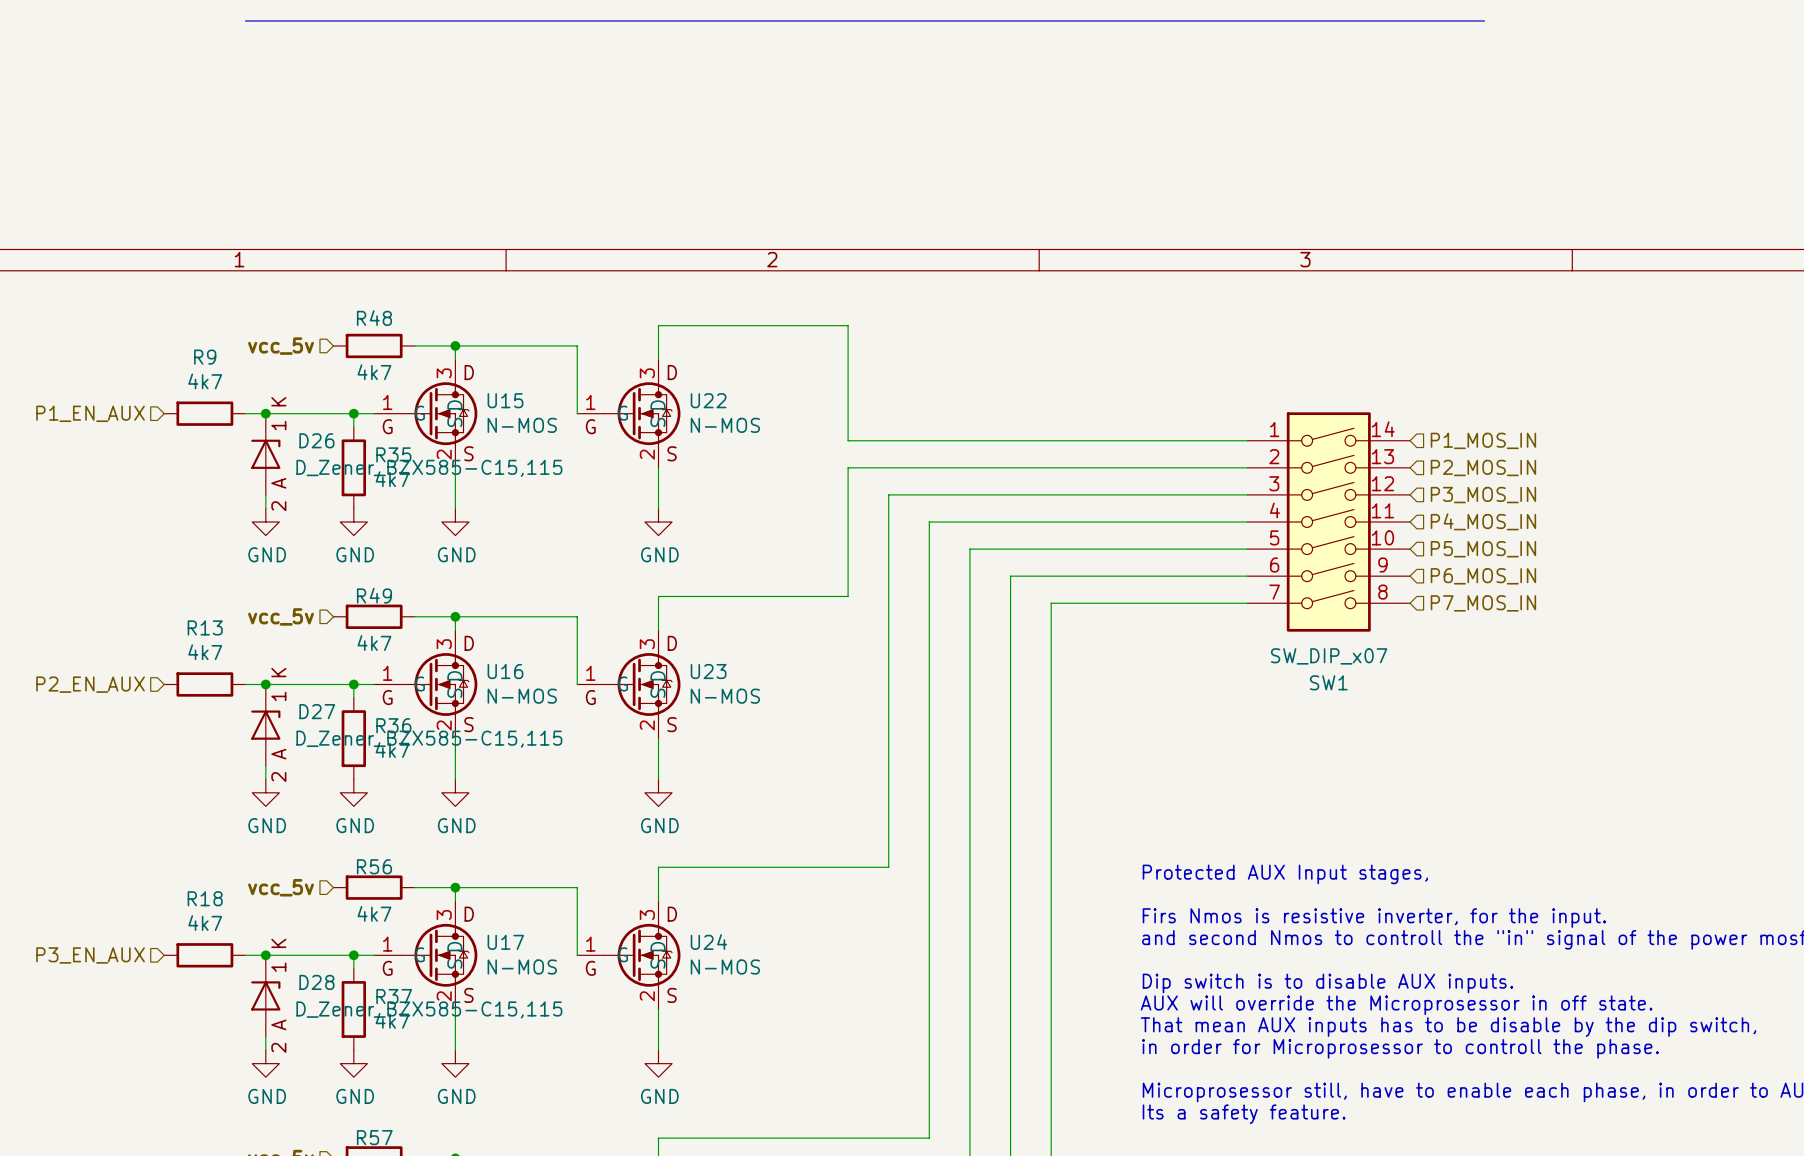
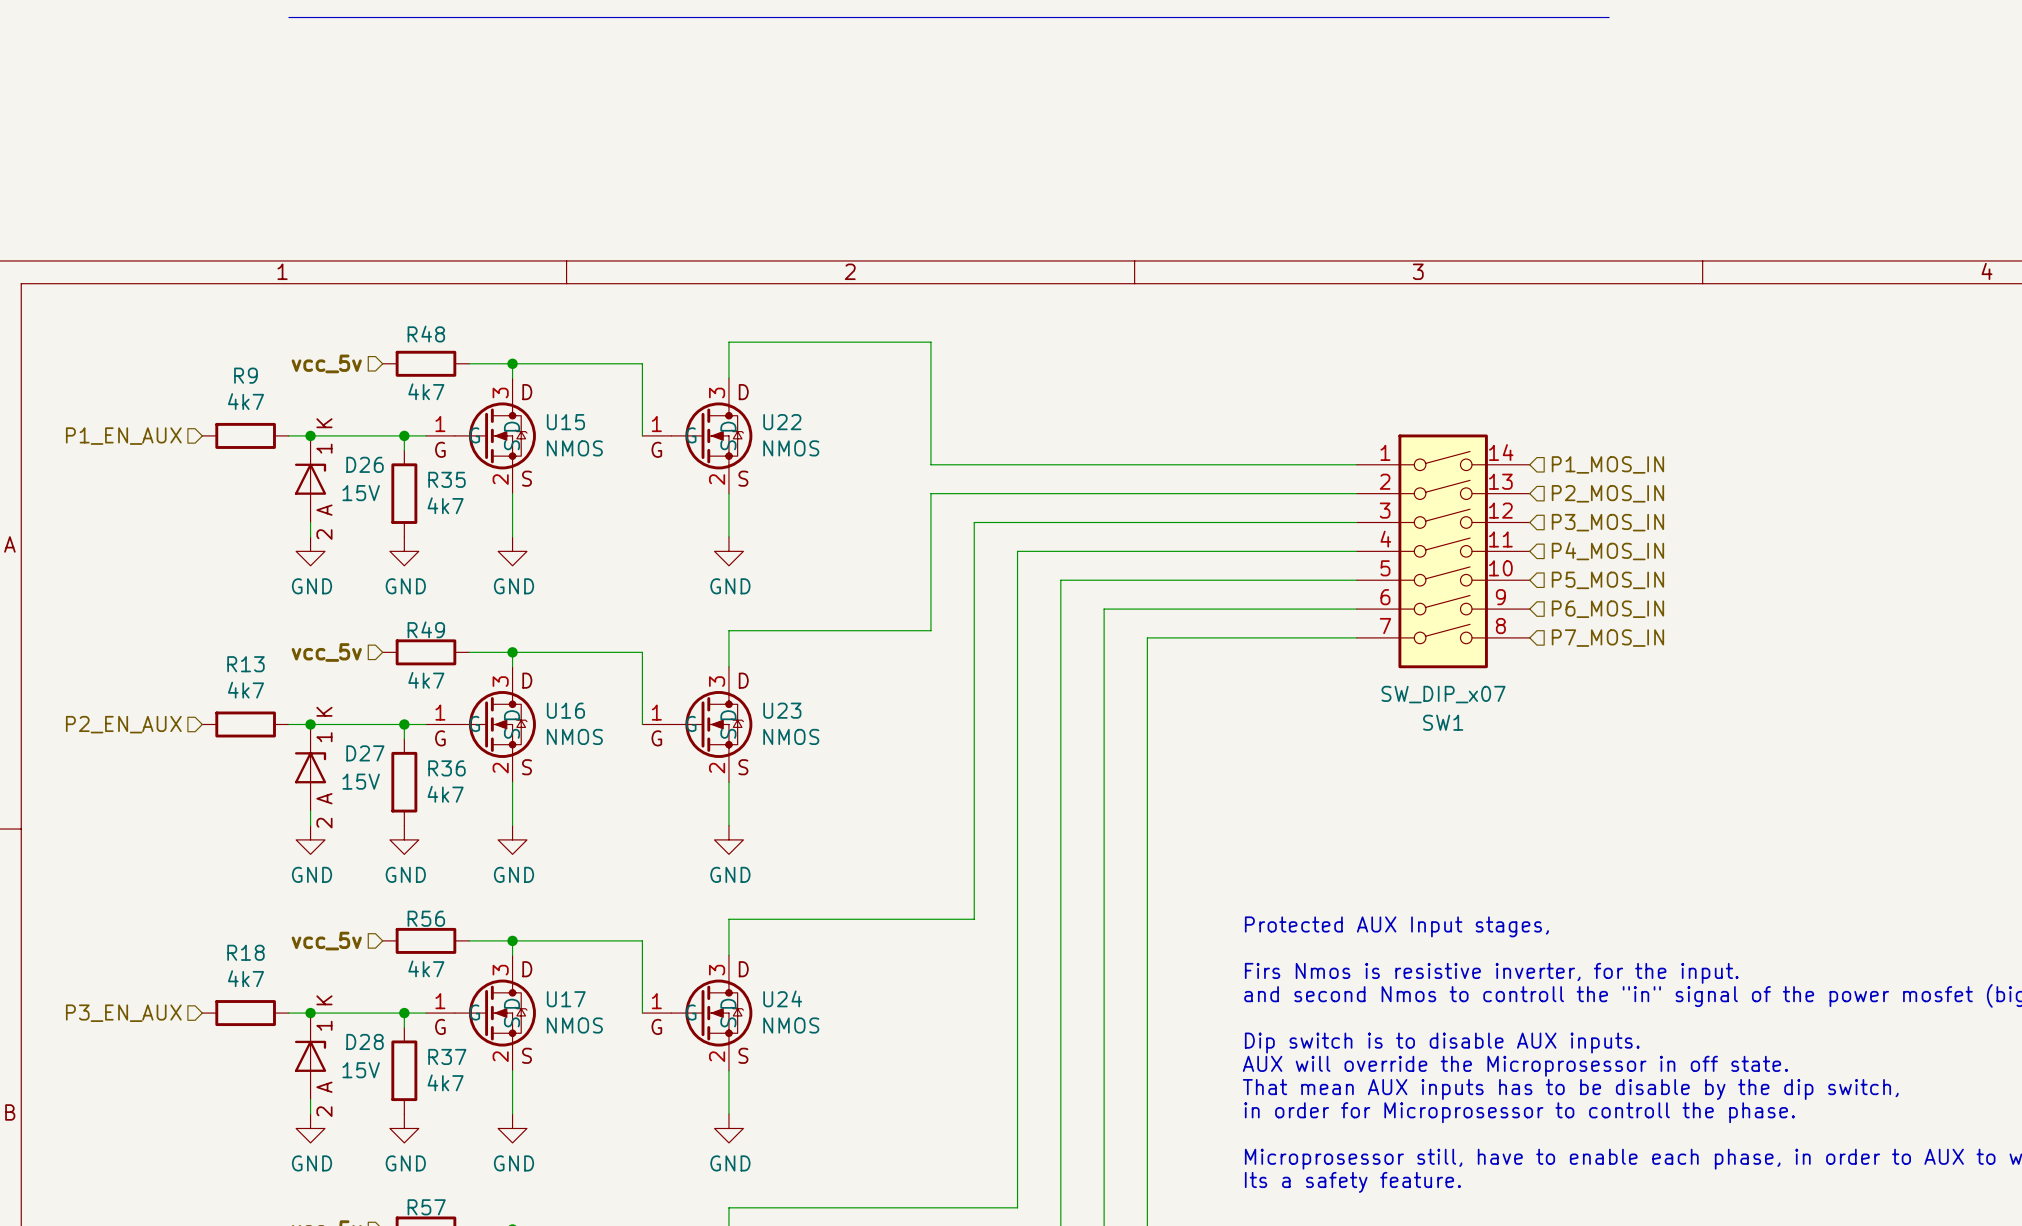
U15 value: N-MOS (522, 425) -> NMOS (574, 448)
U22 value: N-MOS (725, 425) -> NMOS (791, 448)
D26 value: D_Zener_BZX585-C15,115 (429, 468) -> 15V (361, 493)
U16 value: N-MOS (522, 696) -> NMOS (574, 736)
U23 value: N-MOS (725, 696) -> NMOS (791, 736)
D27 value: D_Zener_BZX585-C15,115 (429, 739) -> 15V (361, 781)
U17 value: N-MOS (522, 966) -> NMOS (574, 1025)
U24 value: N-MOS (725, 966) -> NMOS (791, 1025)
D28 value: D_Zener_BZX585-C15,115 (429, 1009) -> 15V (361, 1070)

